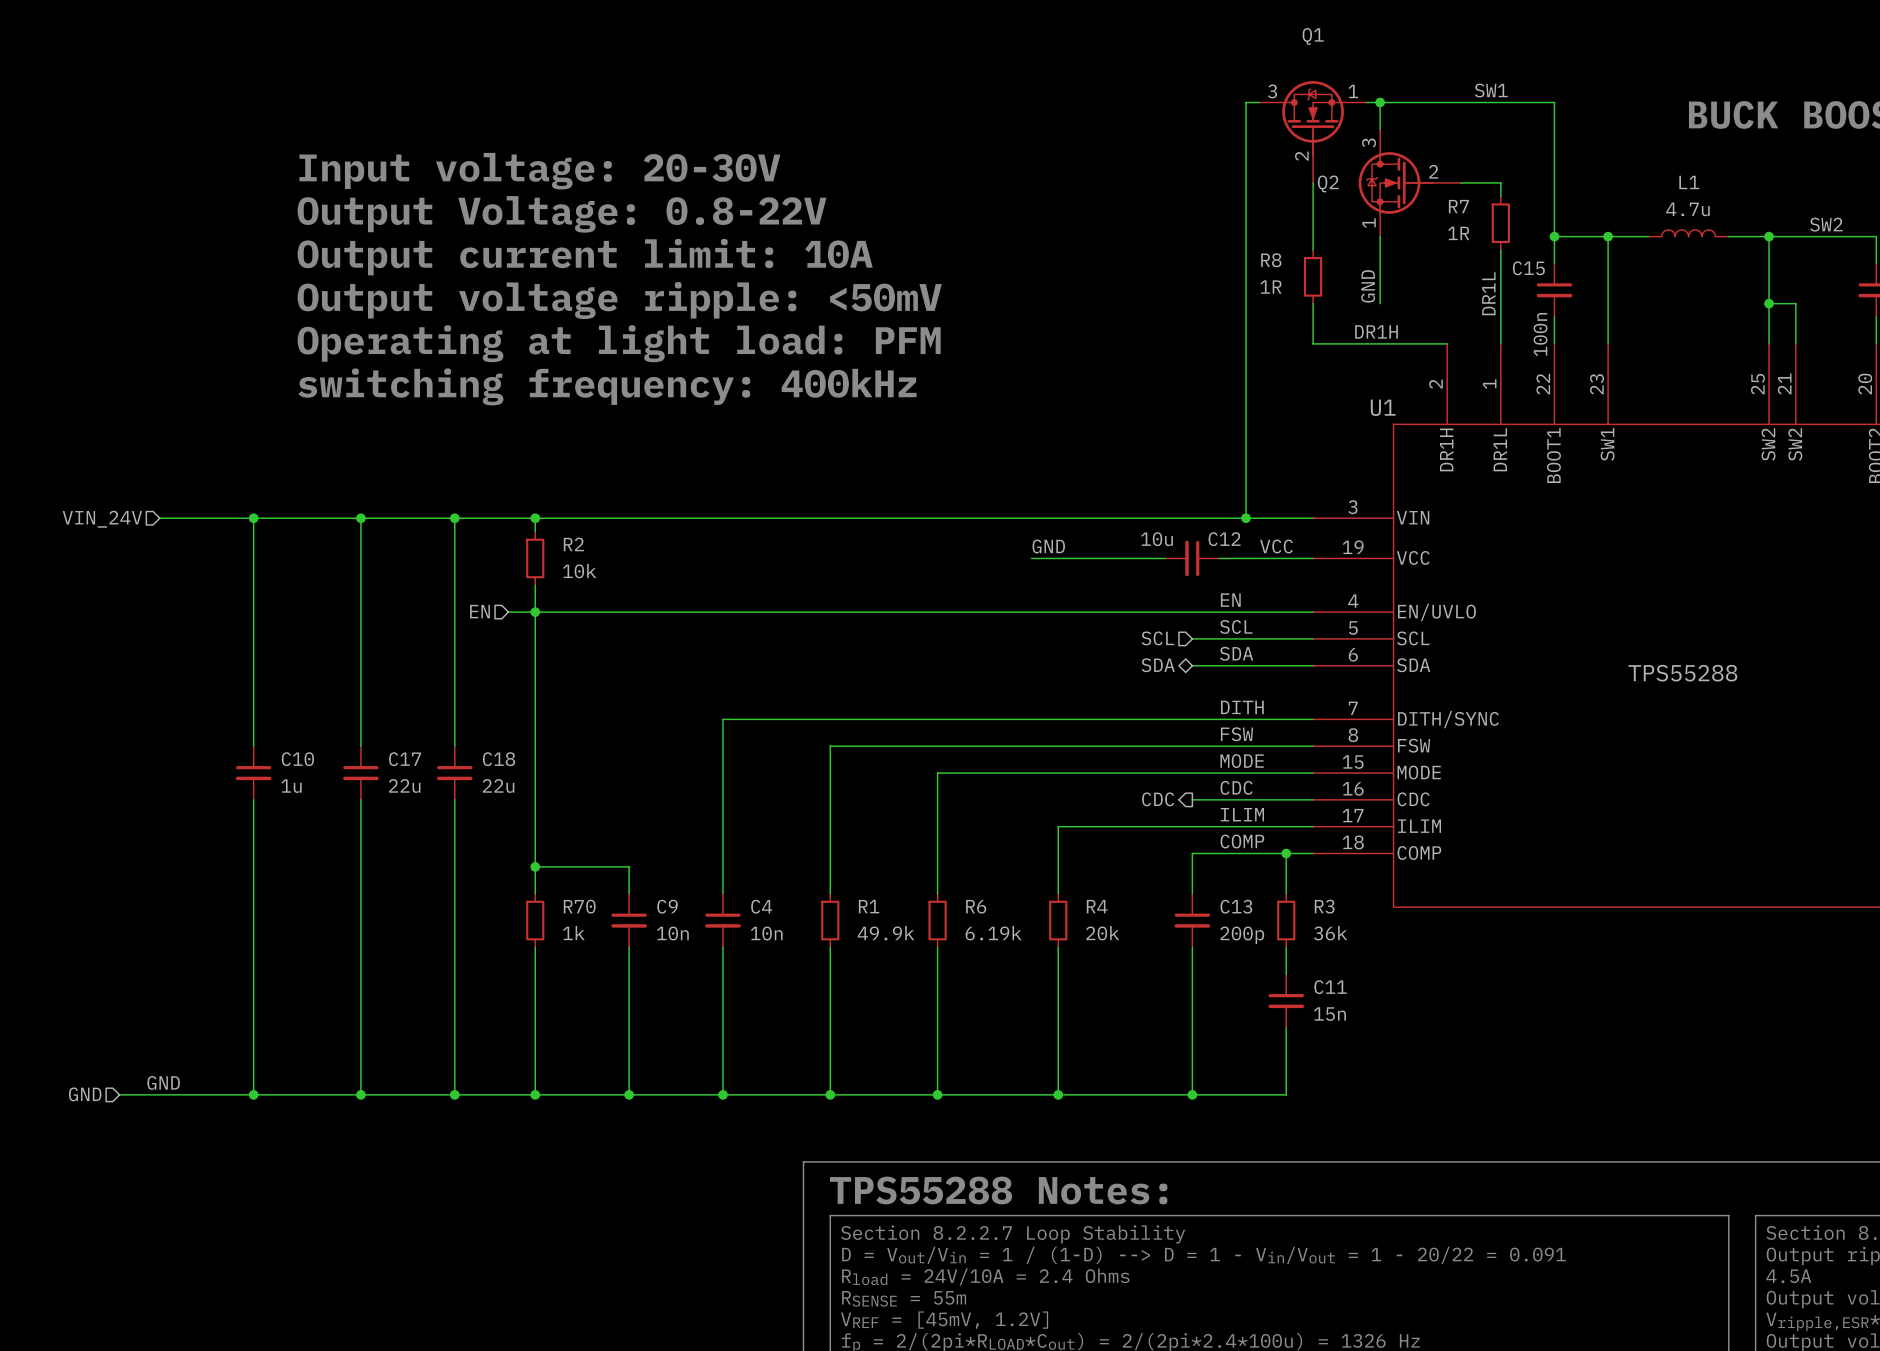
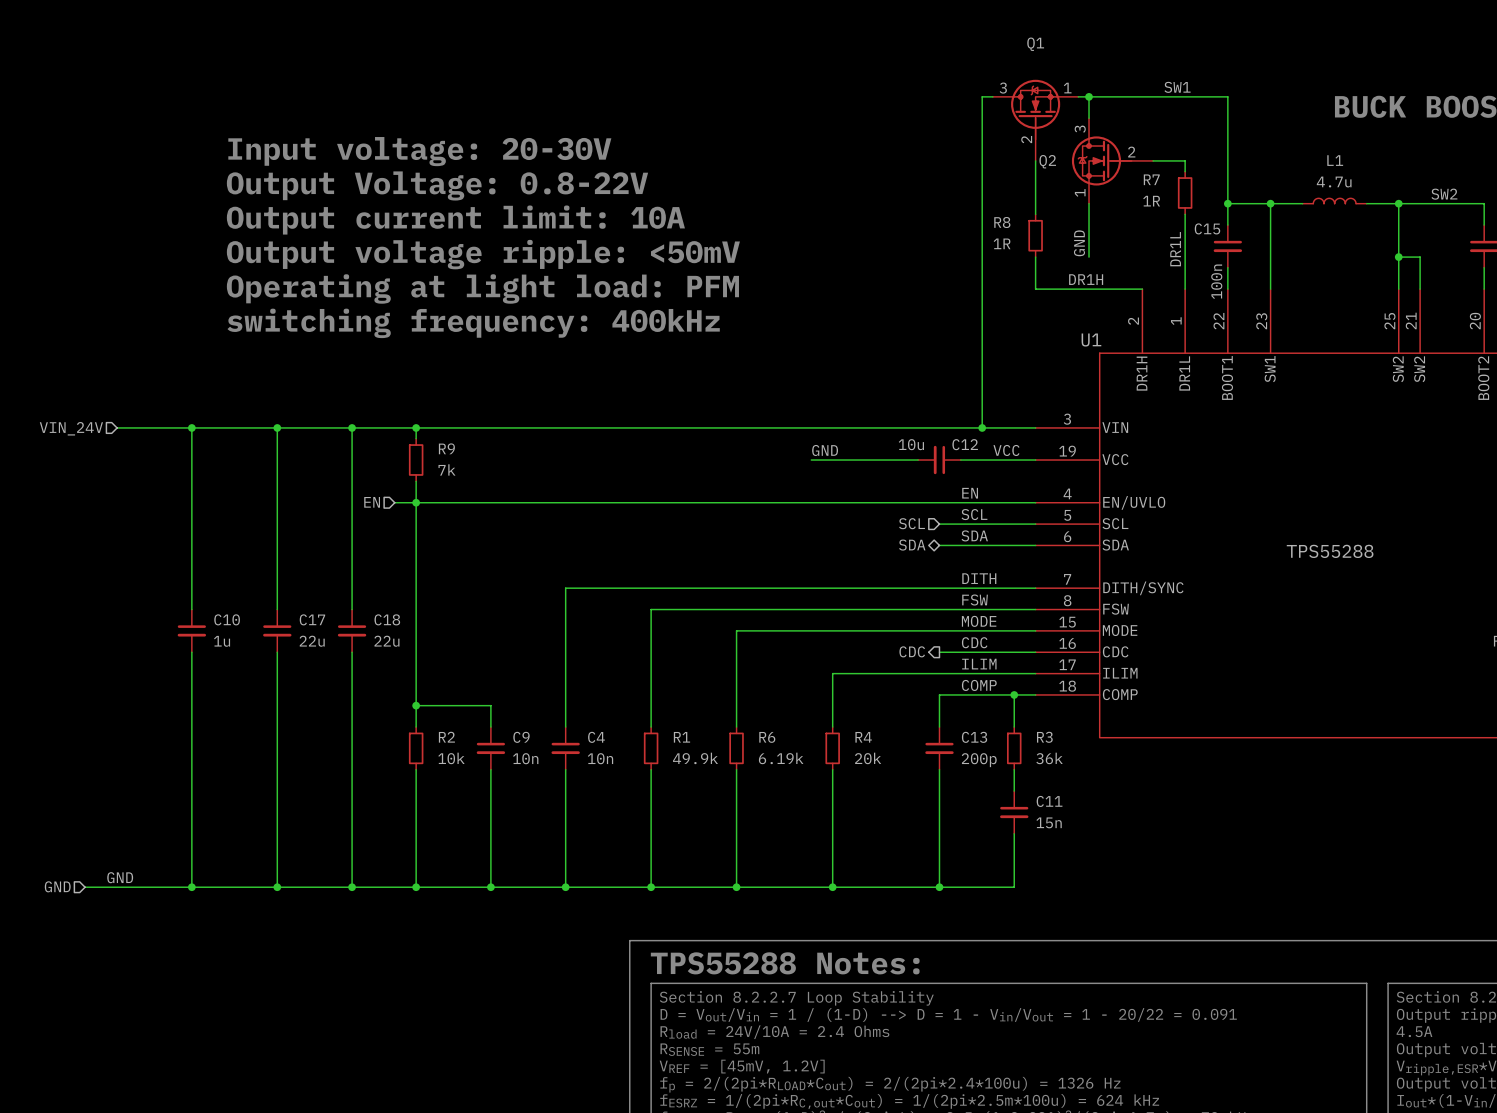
R2 name: R2 (573, 544) -> R9 (446, 448)
R2 value: 10k (579, 571) -> 7k (446, 469)
R70 name: R70 (579, 906) -> R2 (446, 737)
R70 value: 1k (573, 933) -> 10k (451, 758)

